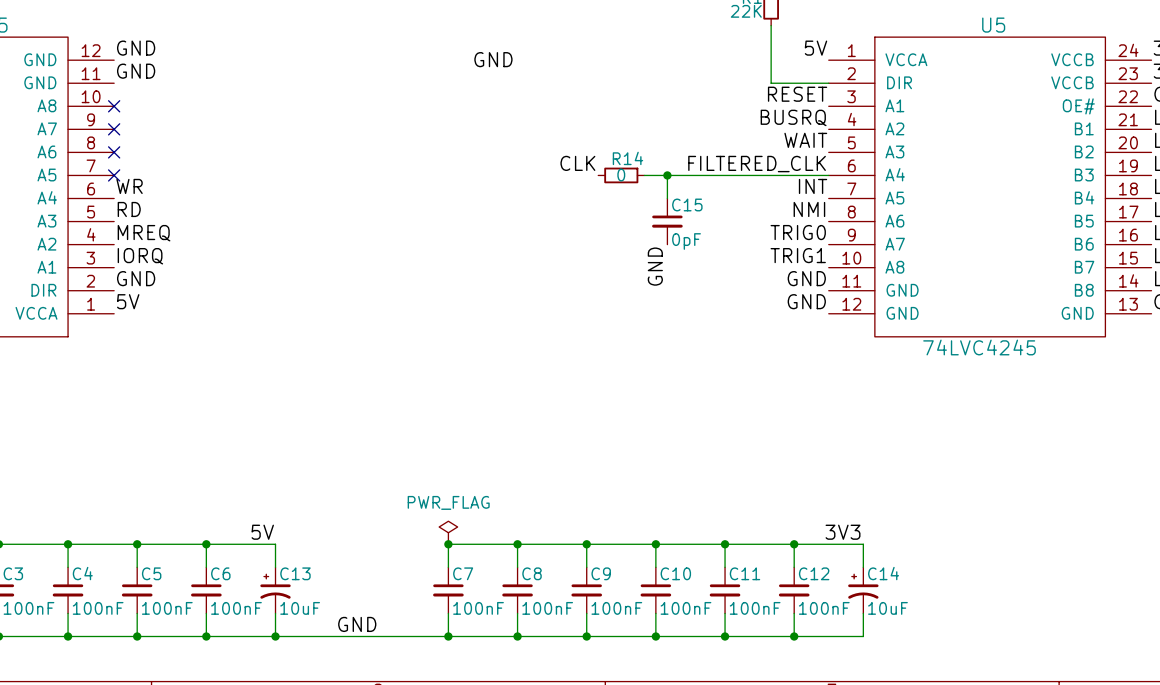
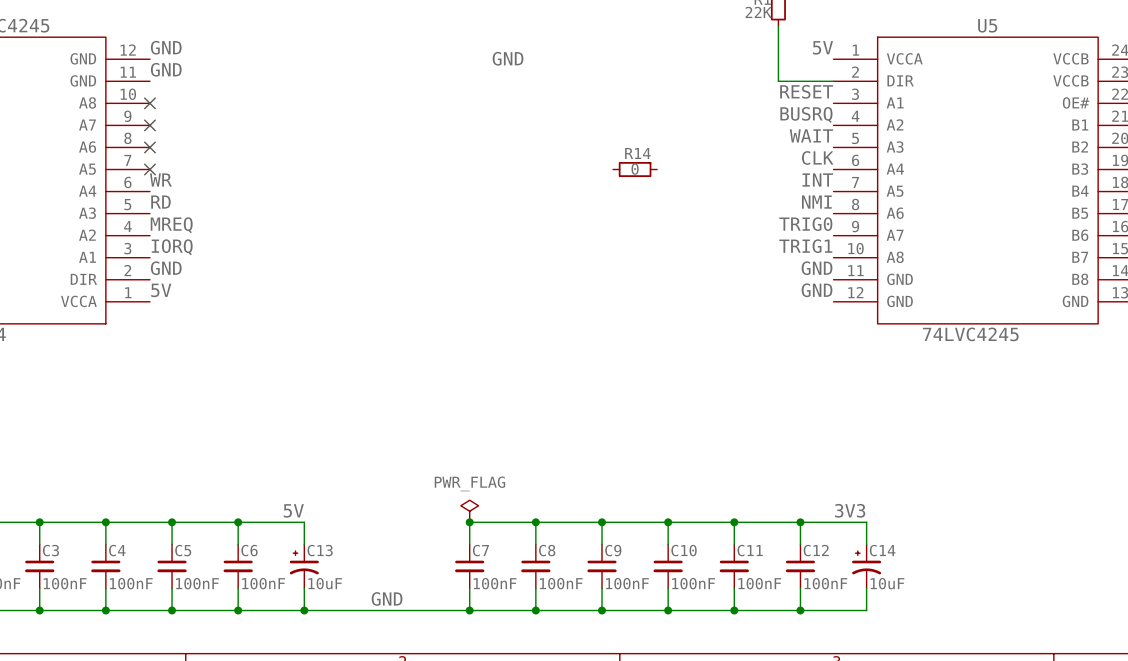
label: CLK (577, 163) -> none
label: FILTERED_CLK (757, 164) -> CLK (817, 157)
wire: (644, 175) (828, 175) -> none
wire: (667, 175) (667, 198) -> none
junction: (667, 175) -> none
C15: 0pF (667, 221) -> none
label: GND (655, 266) -> none

